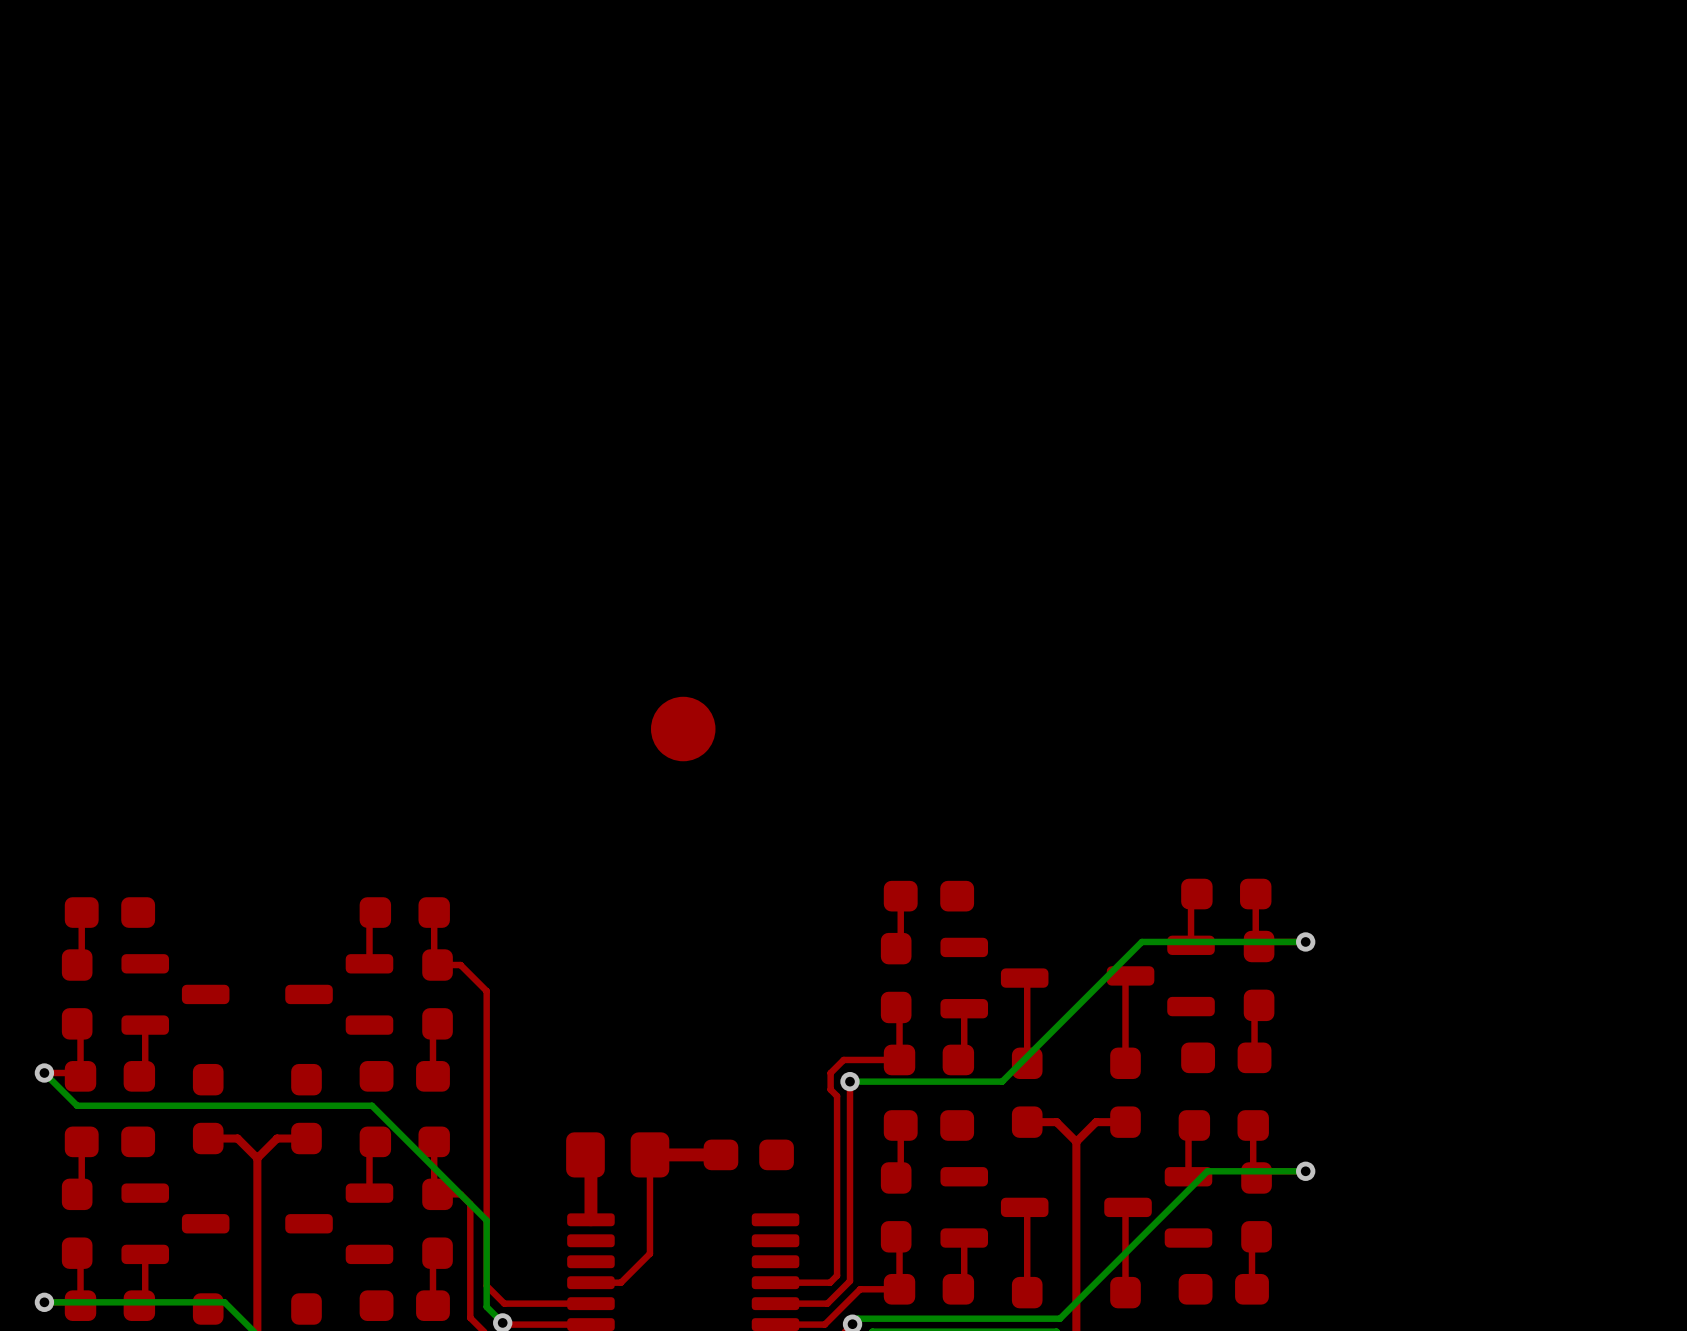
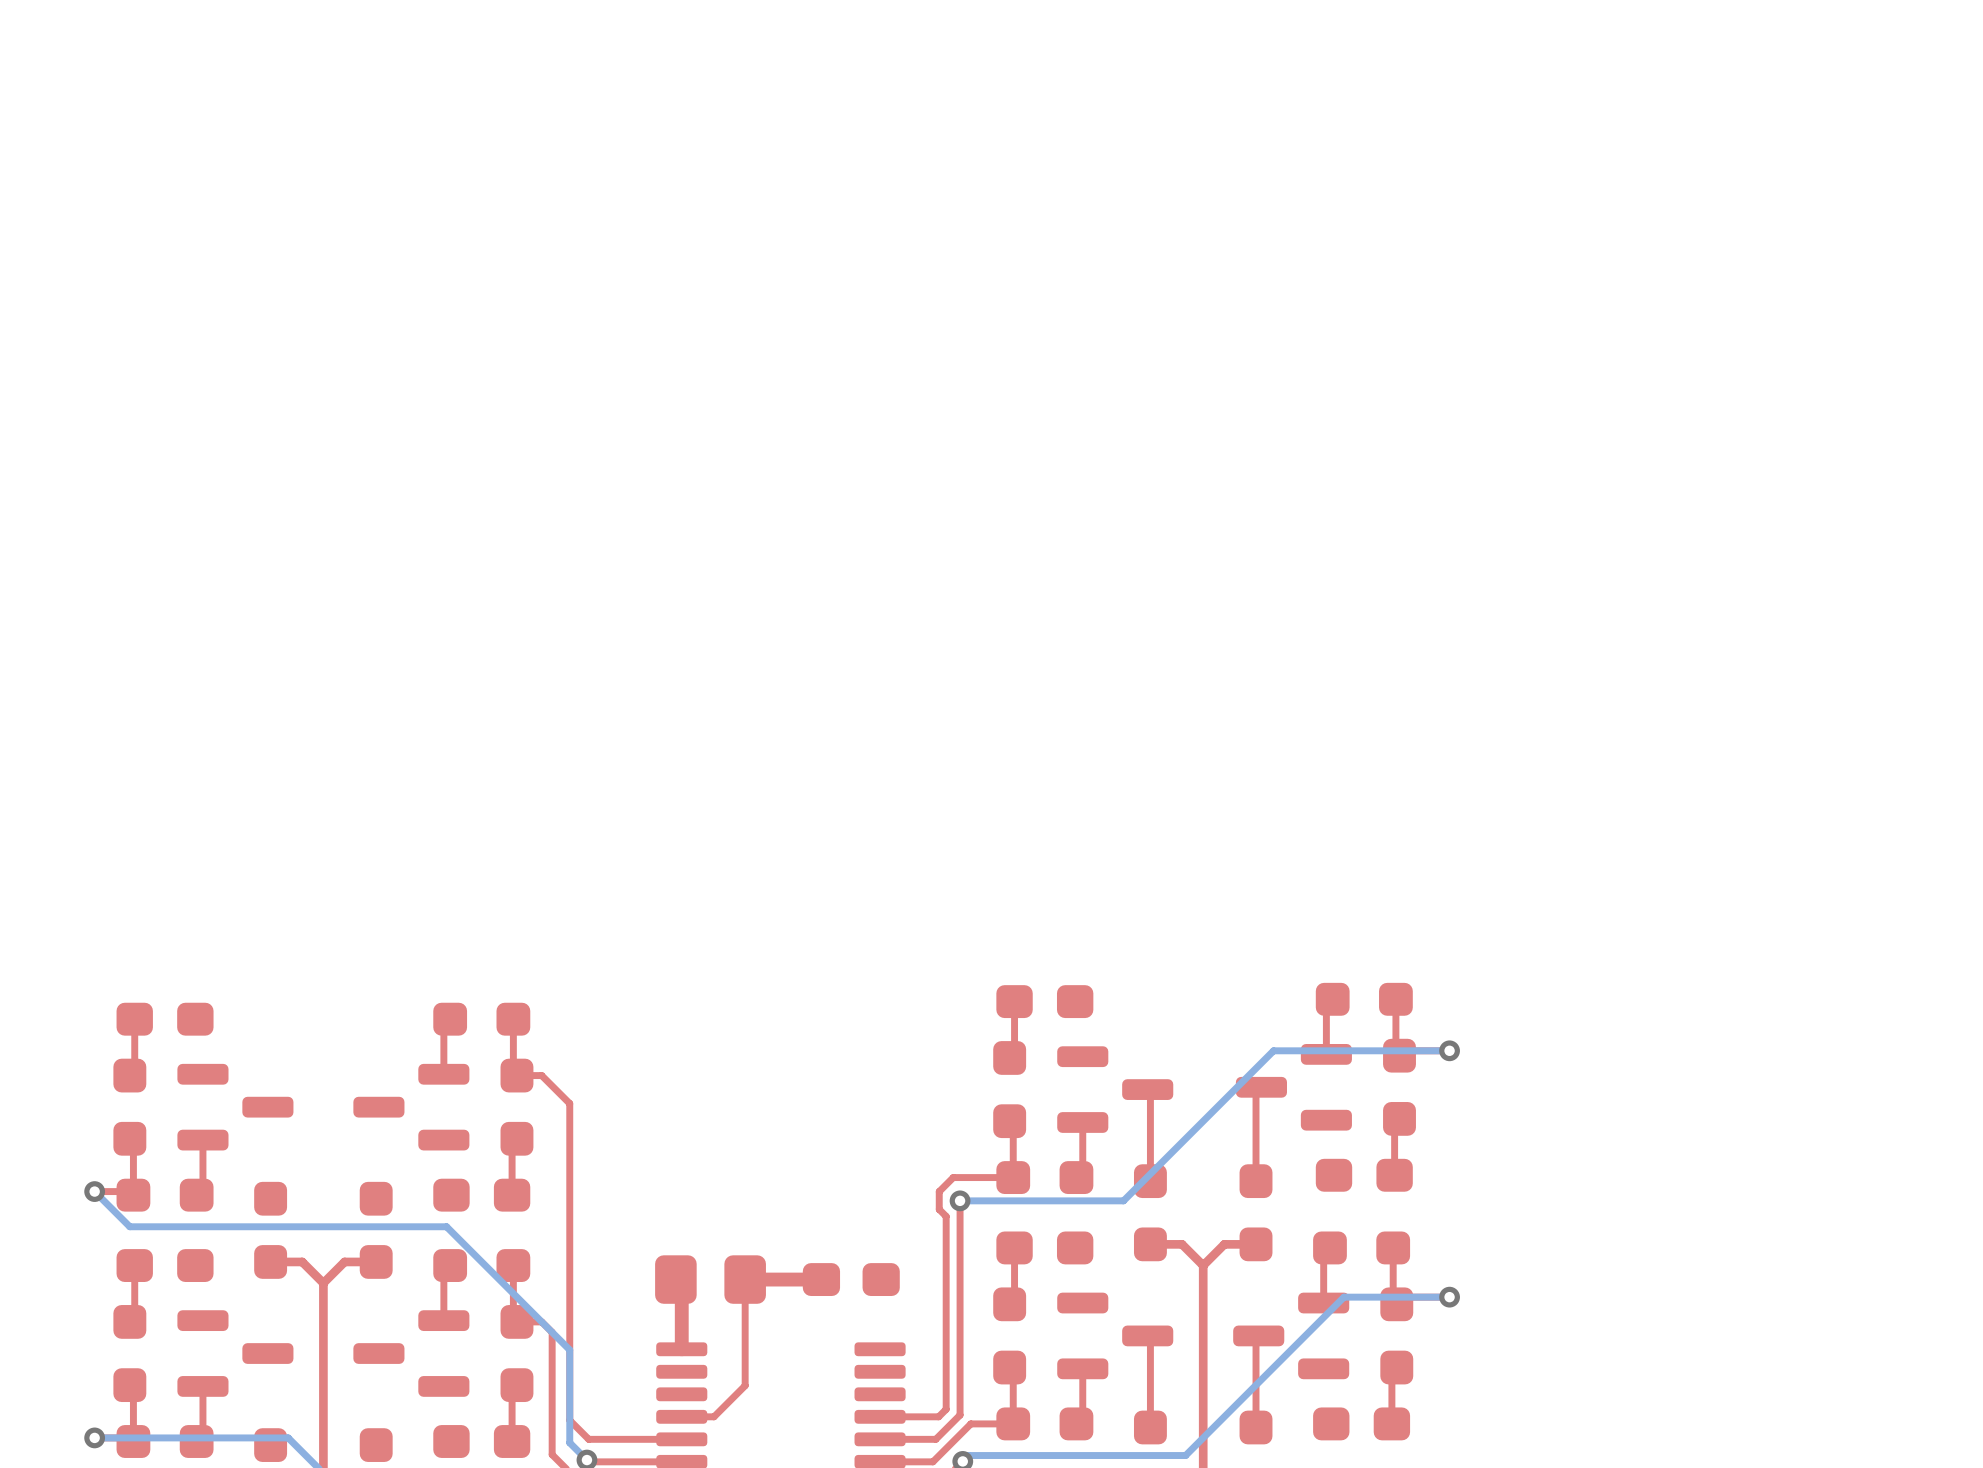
part: (683, 729) -> none

